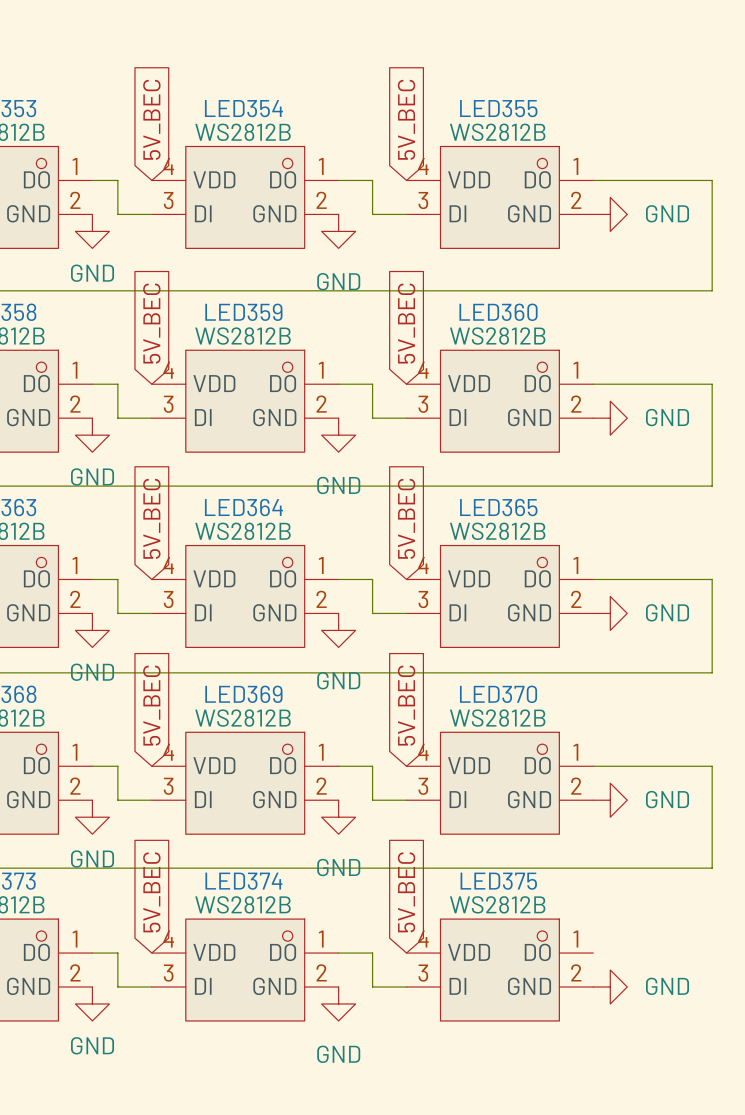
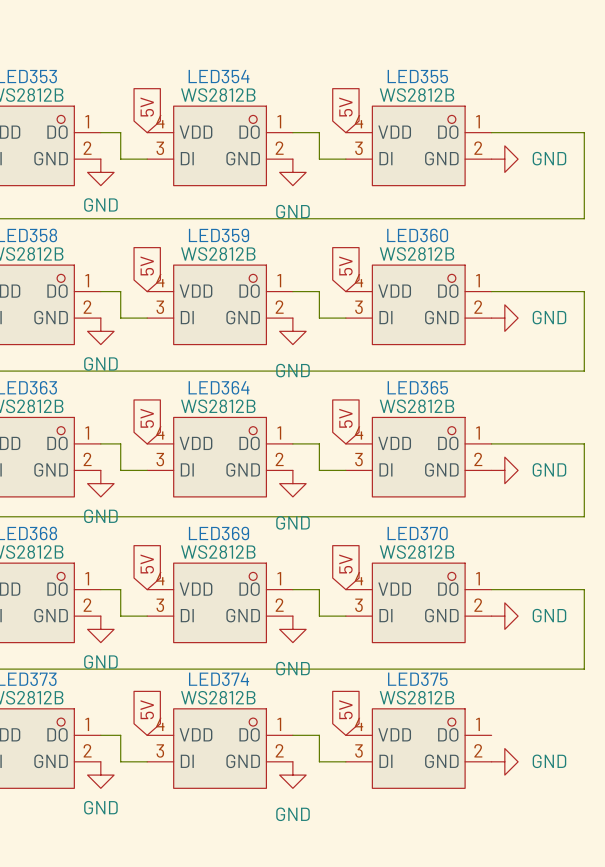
global label: 5V_BEC (151, 119) -> 5V (147, 106)
global label: 5V_BEC (406, 119) -> 5V (345, 106)
global label: 5V_BEC (151, 323) -> 5V (147, 265)
global label: 5V_BEC (406, 323) -> 5V (345, 265)
global label: 5V_BEC (151, 518) -> 5V (147, 418)
global label: 5V_BEC (406, 518) -> 5V (345, 418)
global label: 5V_BEC (151, 705) -> 5V (147, 563)
global label: 5V_BEC (406, 705) -> 5V (345, 563)
global label: 5V_BEC (151, 892) -> 5V (147, 709)
global label: 5V_BEC (406, 892) -> 5V (345, 709)

